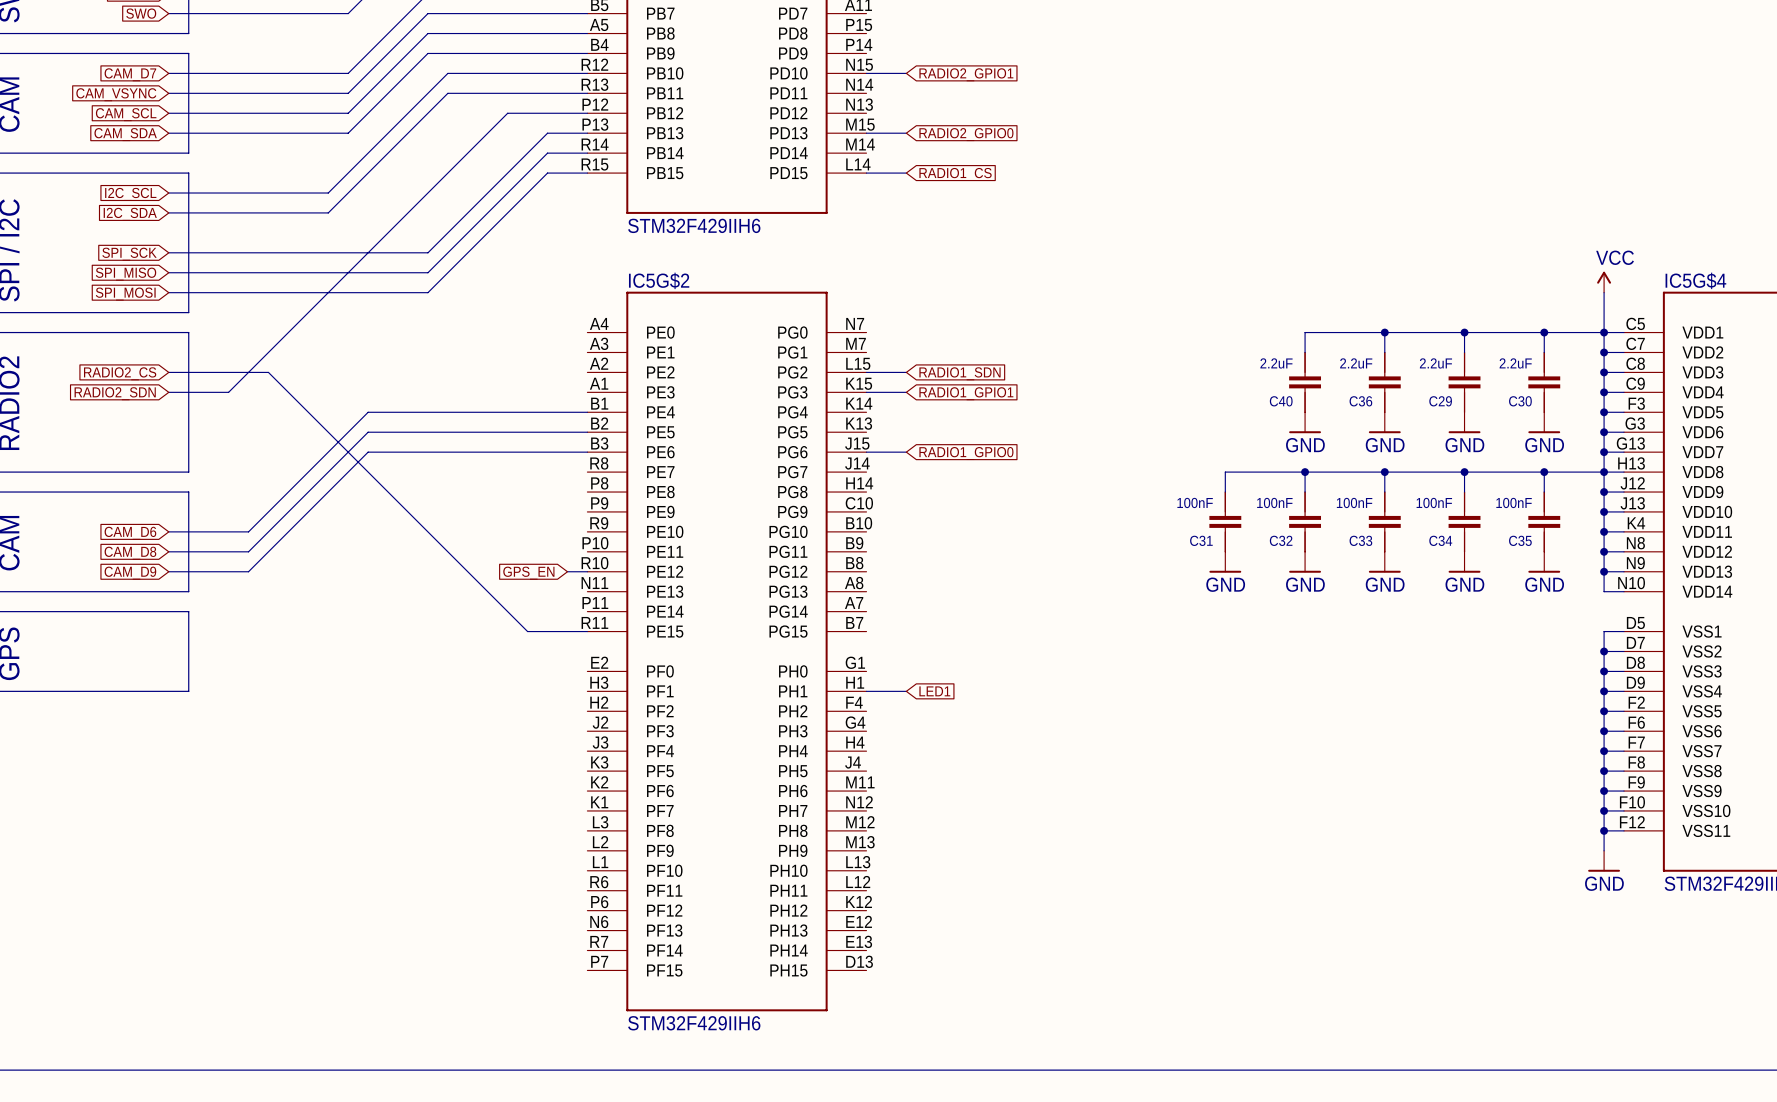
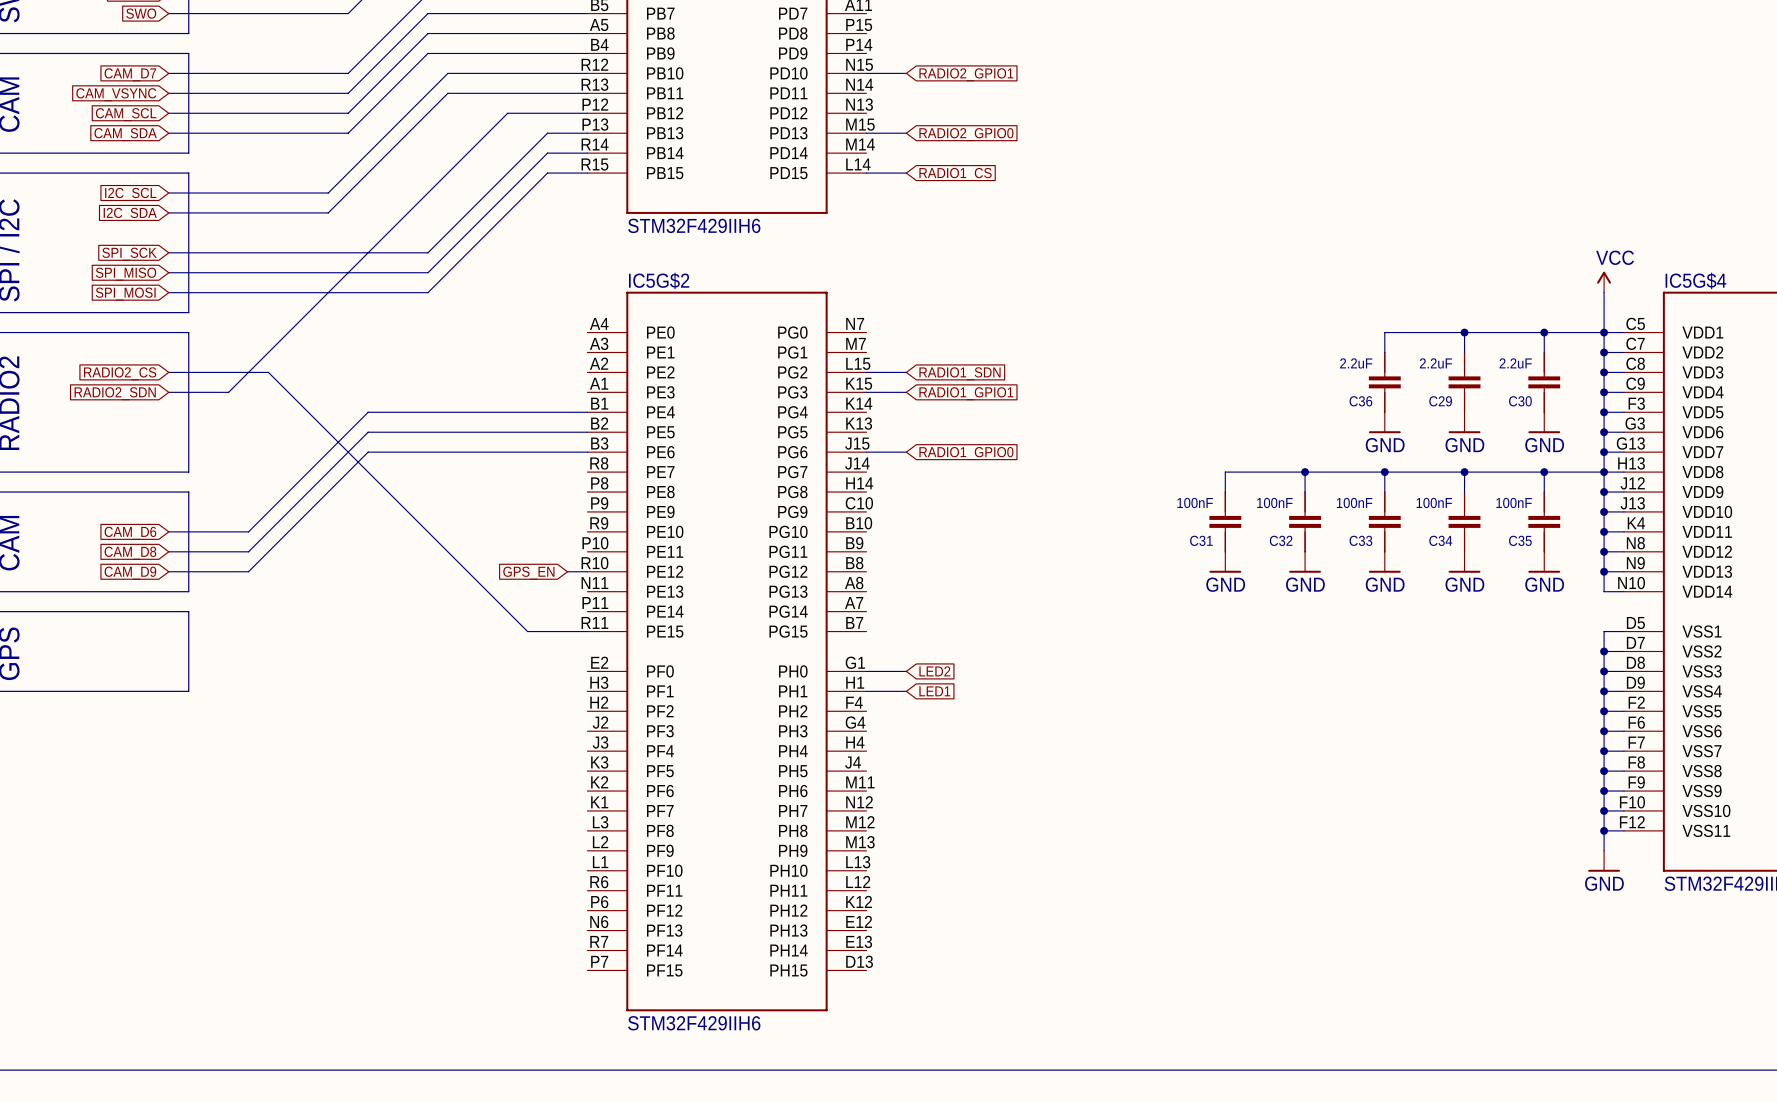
wire: (1384, 332) (1305, 332) (1305, 352) -> none
junction: (1384, 332) -> none
C40: 2.2uF (1305, 382) -> none
power symbol: GND (1305, 422) -> none
wire: none -> (866, 671) (906, 671)
global label: none -> LED2 (934, 671)

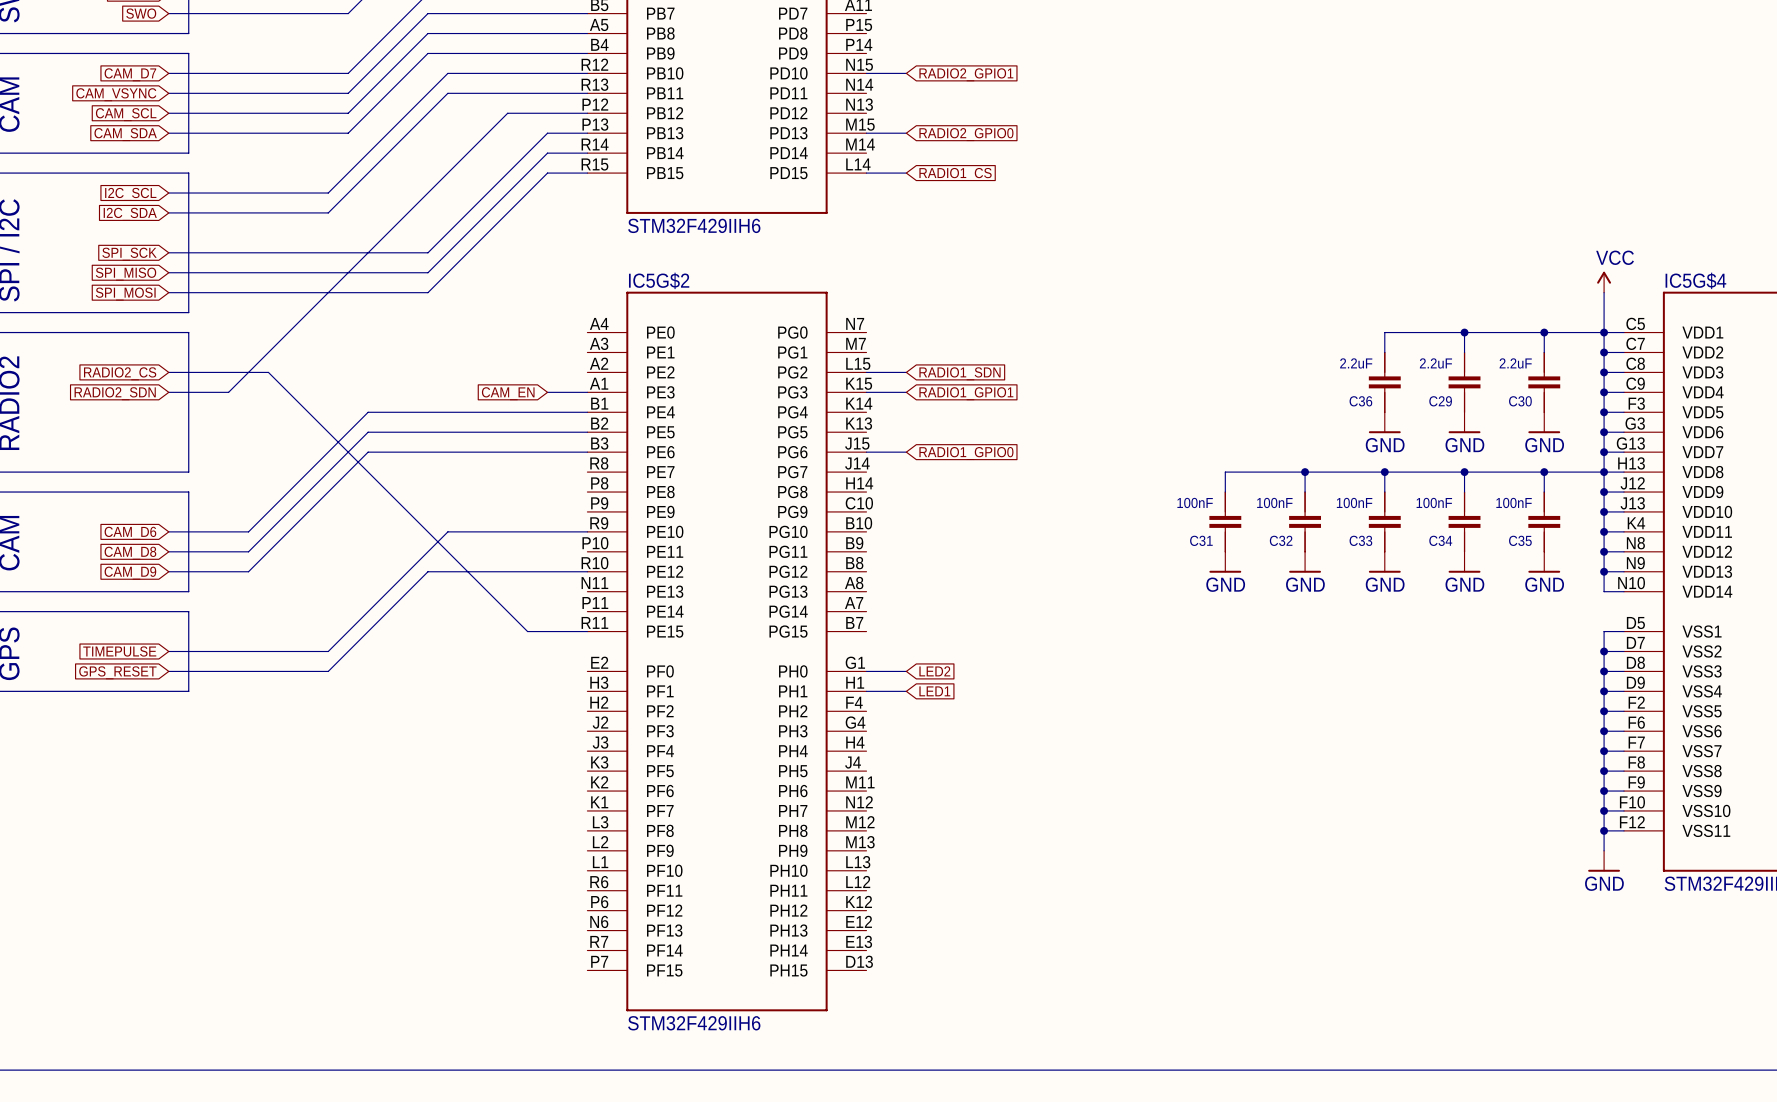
wire: none -> (547, 392) (587, 392)
global label: none -> CAM_EN (508, 393)
wire: none -> (587, 531) (447, 531) (328, 651) (168, 651)
wire: none -> (567, 571) (427, 571) (328, 671) (168, 671)
global label: GPS_EN (528, 573) -> none
global label: none -> TIMEPULSE (119, 651)
global label: none -> GPS_RESET (117, 672)

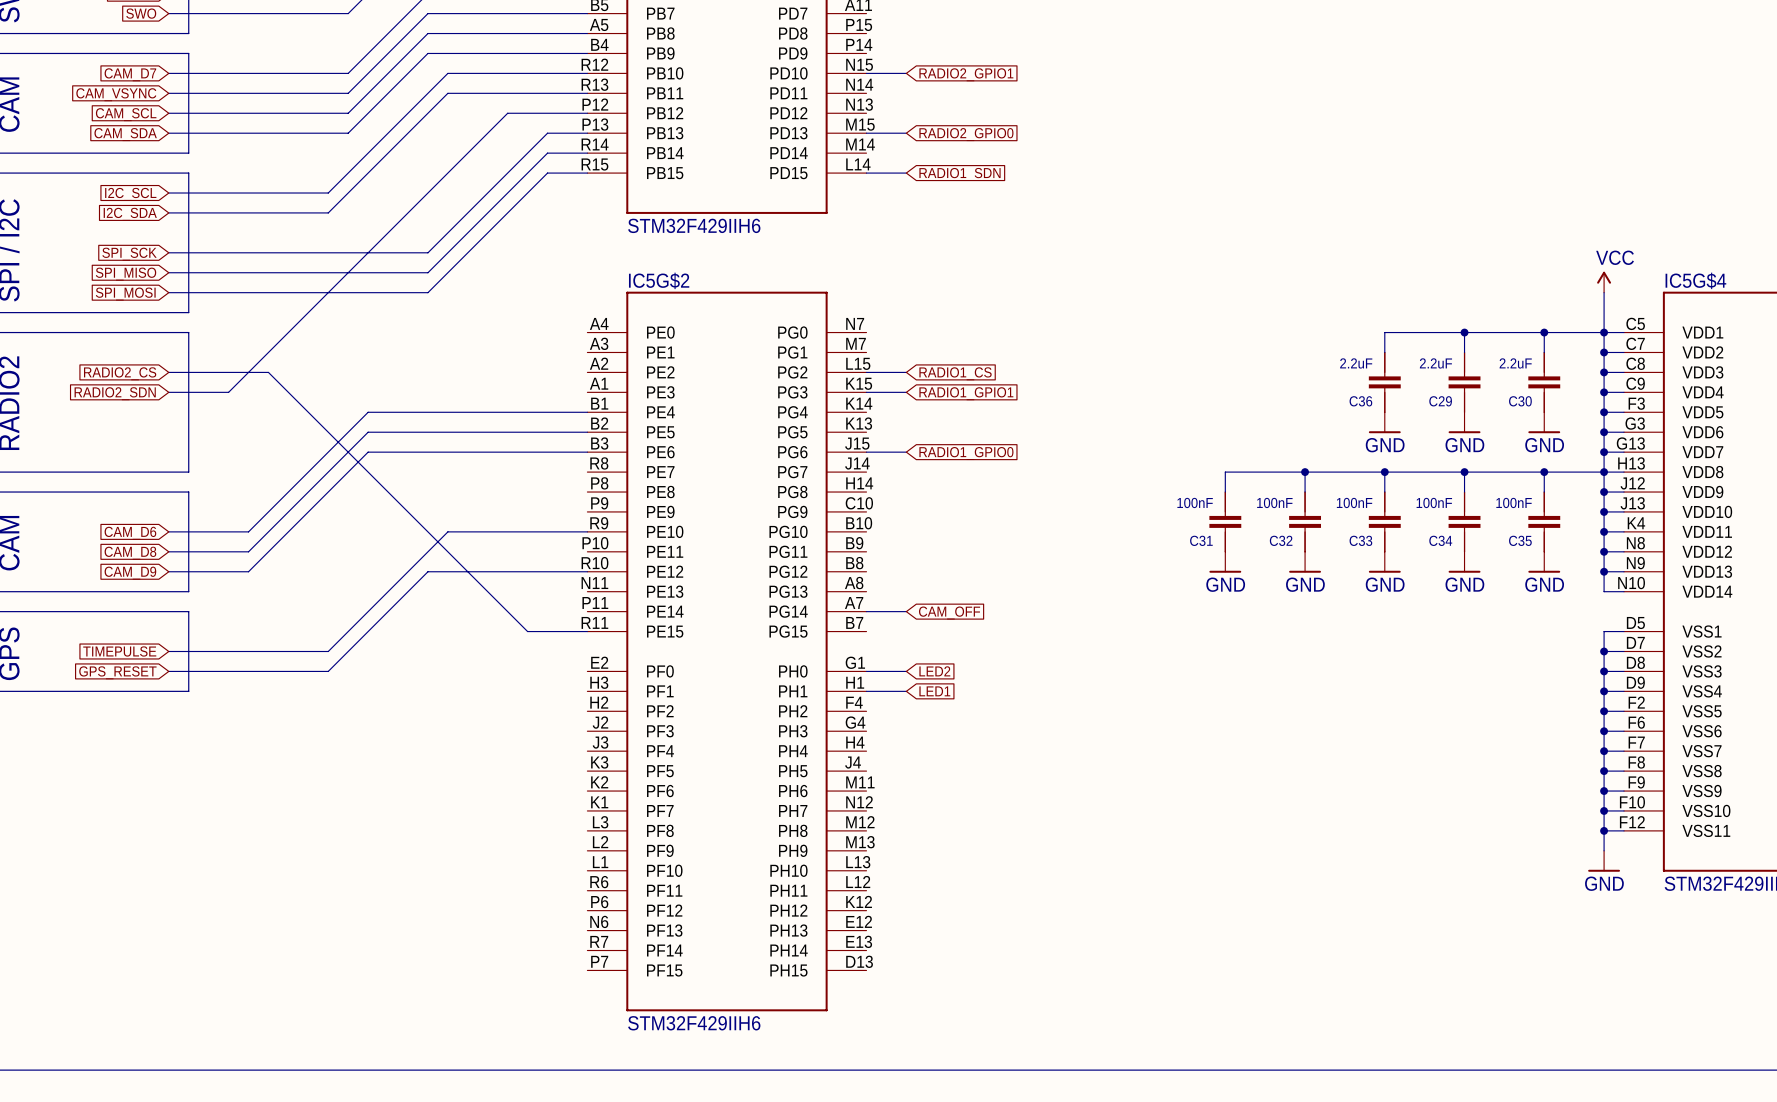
global label: RADIO1_CS (955, 174) -> RADIO1_SDN (960, 174)
global label: RADIO1_SDN (960, 373) -> RADIO1_CS (955, 373)
wire: (547, 392) (587, 392) -> none
global label: CAM_EN (508, 393) -> none
wire: none -> (866, 611) (906, 611)
global label: none -> CAM_OFF (949, 612)

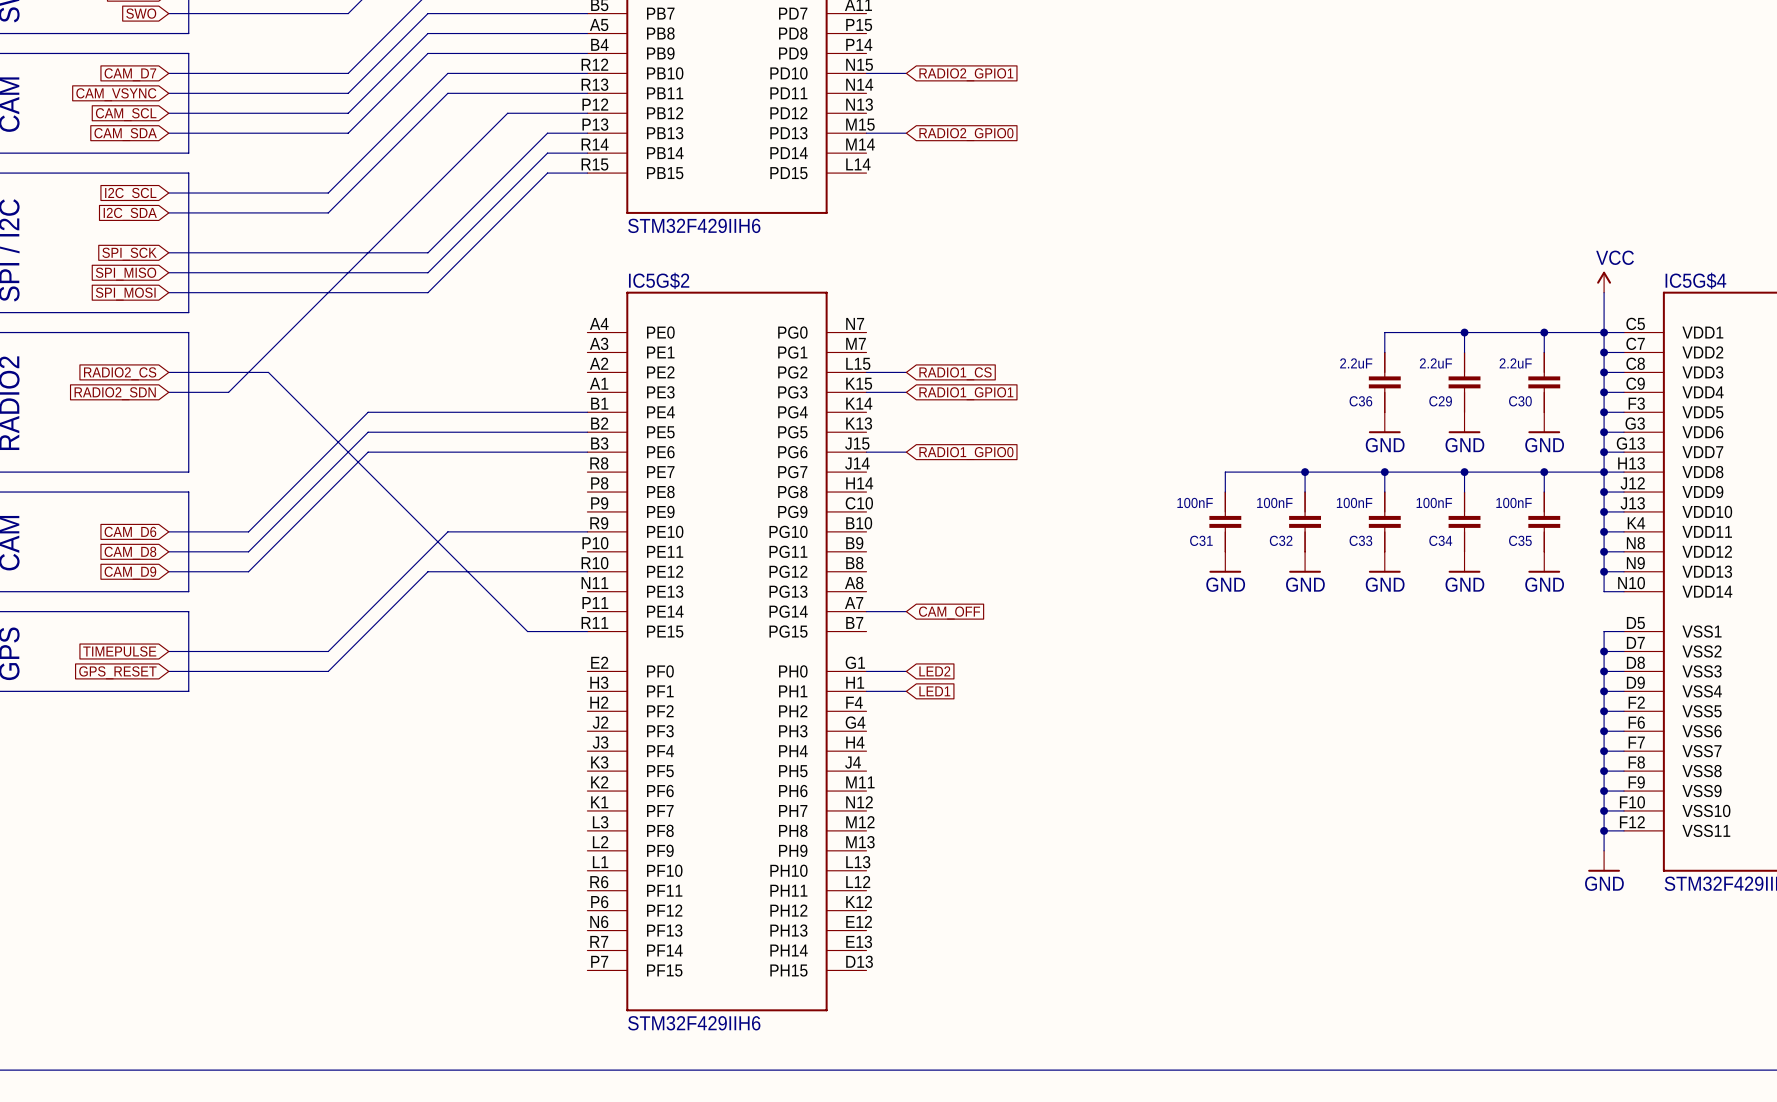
wire: (866, 173) (906, 173) -> none
global label: RADIO1_SDN (960, 174) -> none

